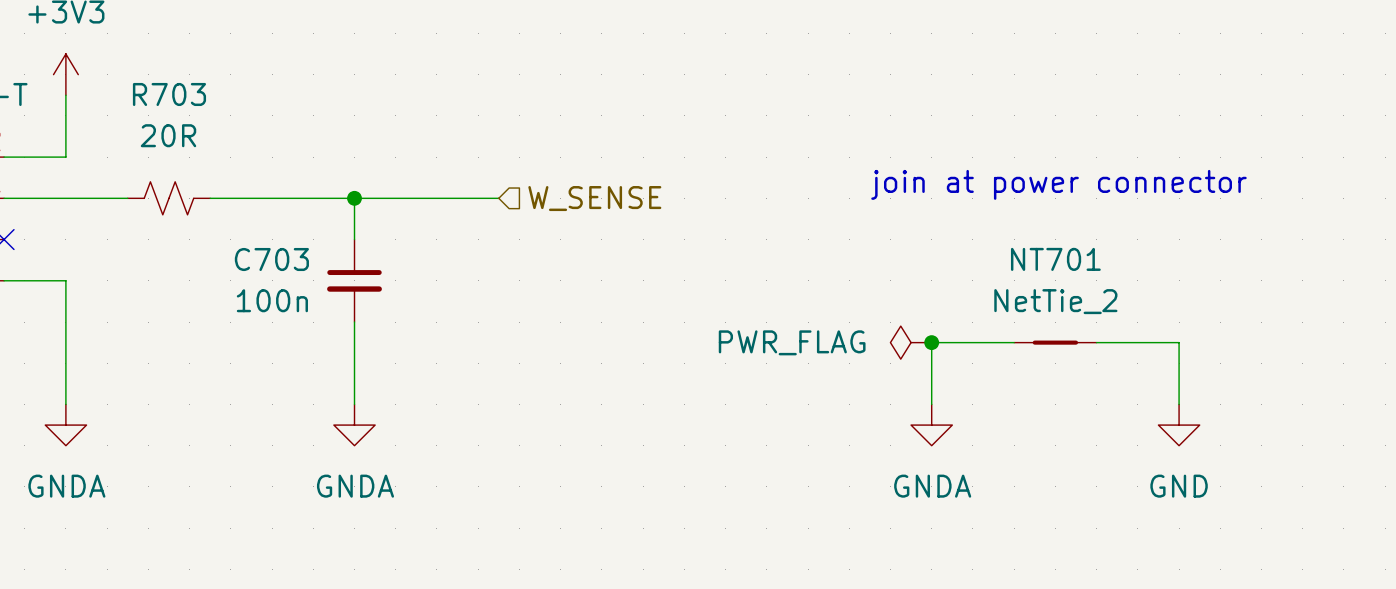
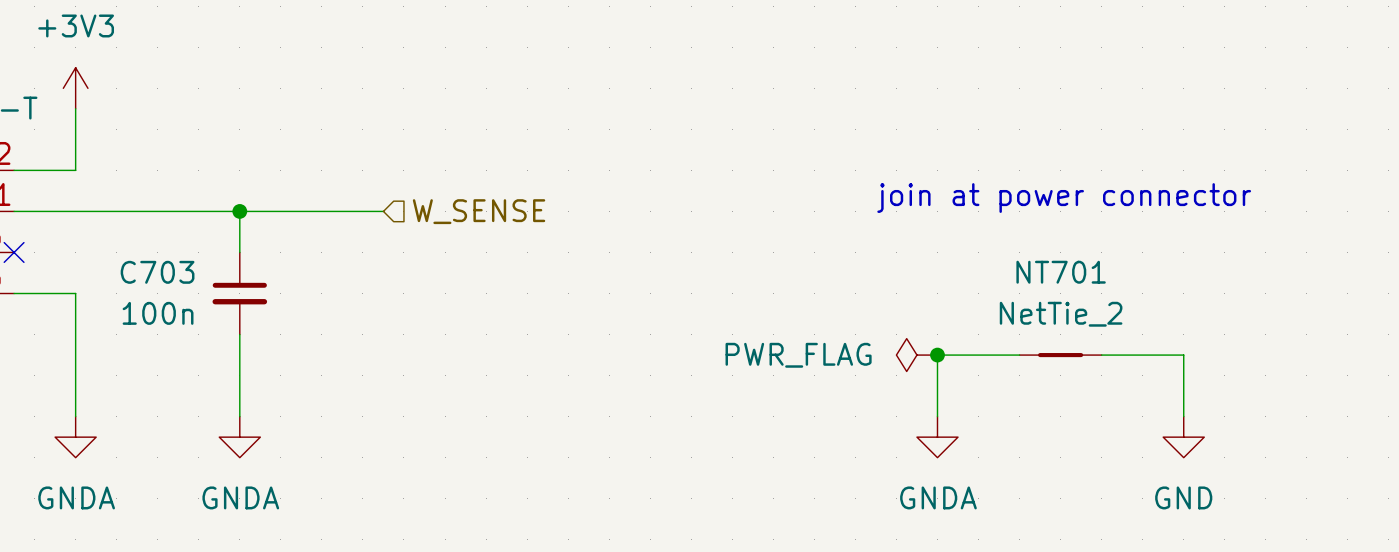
wire: none -> (137, 211) (219, 211)
R703: 20R (168, 198) -> none
junction: none -> (239, 211)
wire: (354, 198) (354, 239) -> (239, 211) (239, 252)
junction: (354, 198) -> none
wire: (375, 198) (498, 198) -> none
hierarchical label position: W_SENSE (594, 198) -> W_SENSE (479, 211)
C703 position: (354, 280) -> (239, 293)
wire: (354, 322) (354, 404) -> (239, 334) (239, 416)
power symbol position: GNDA (354, 425) -> GNDA (239, 437)

